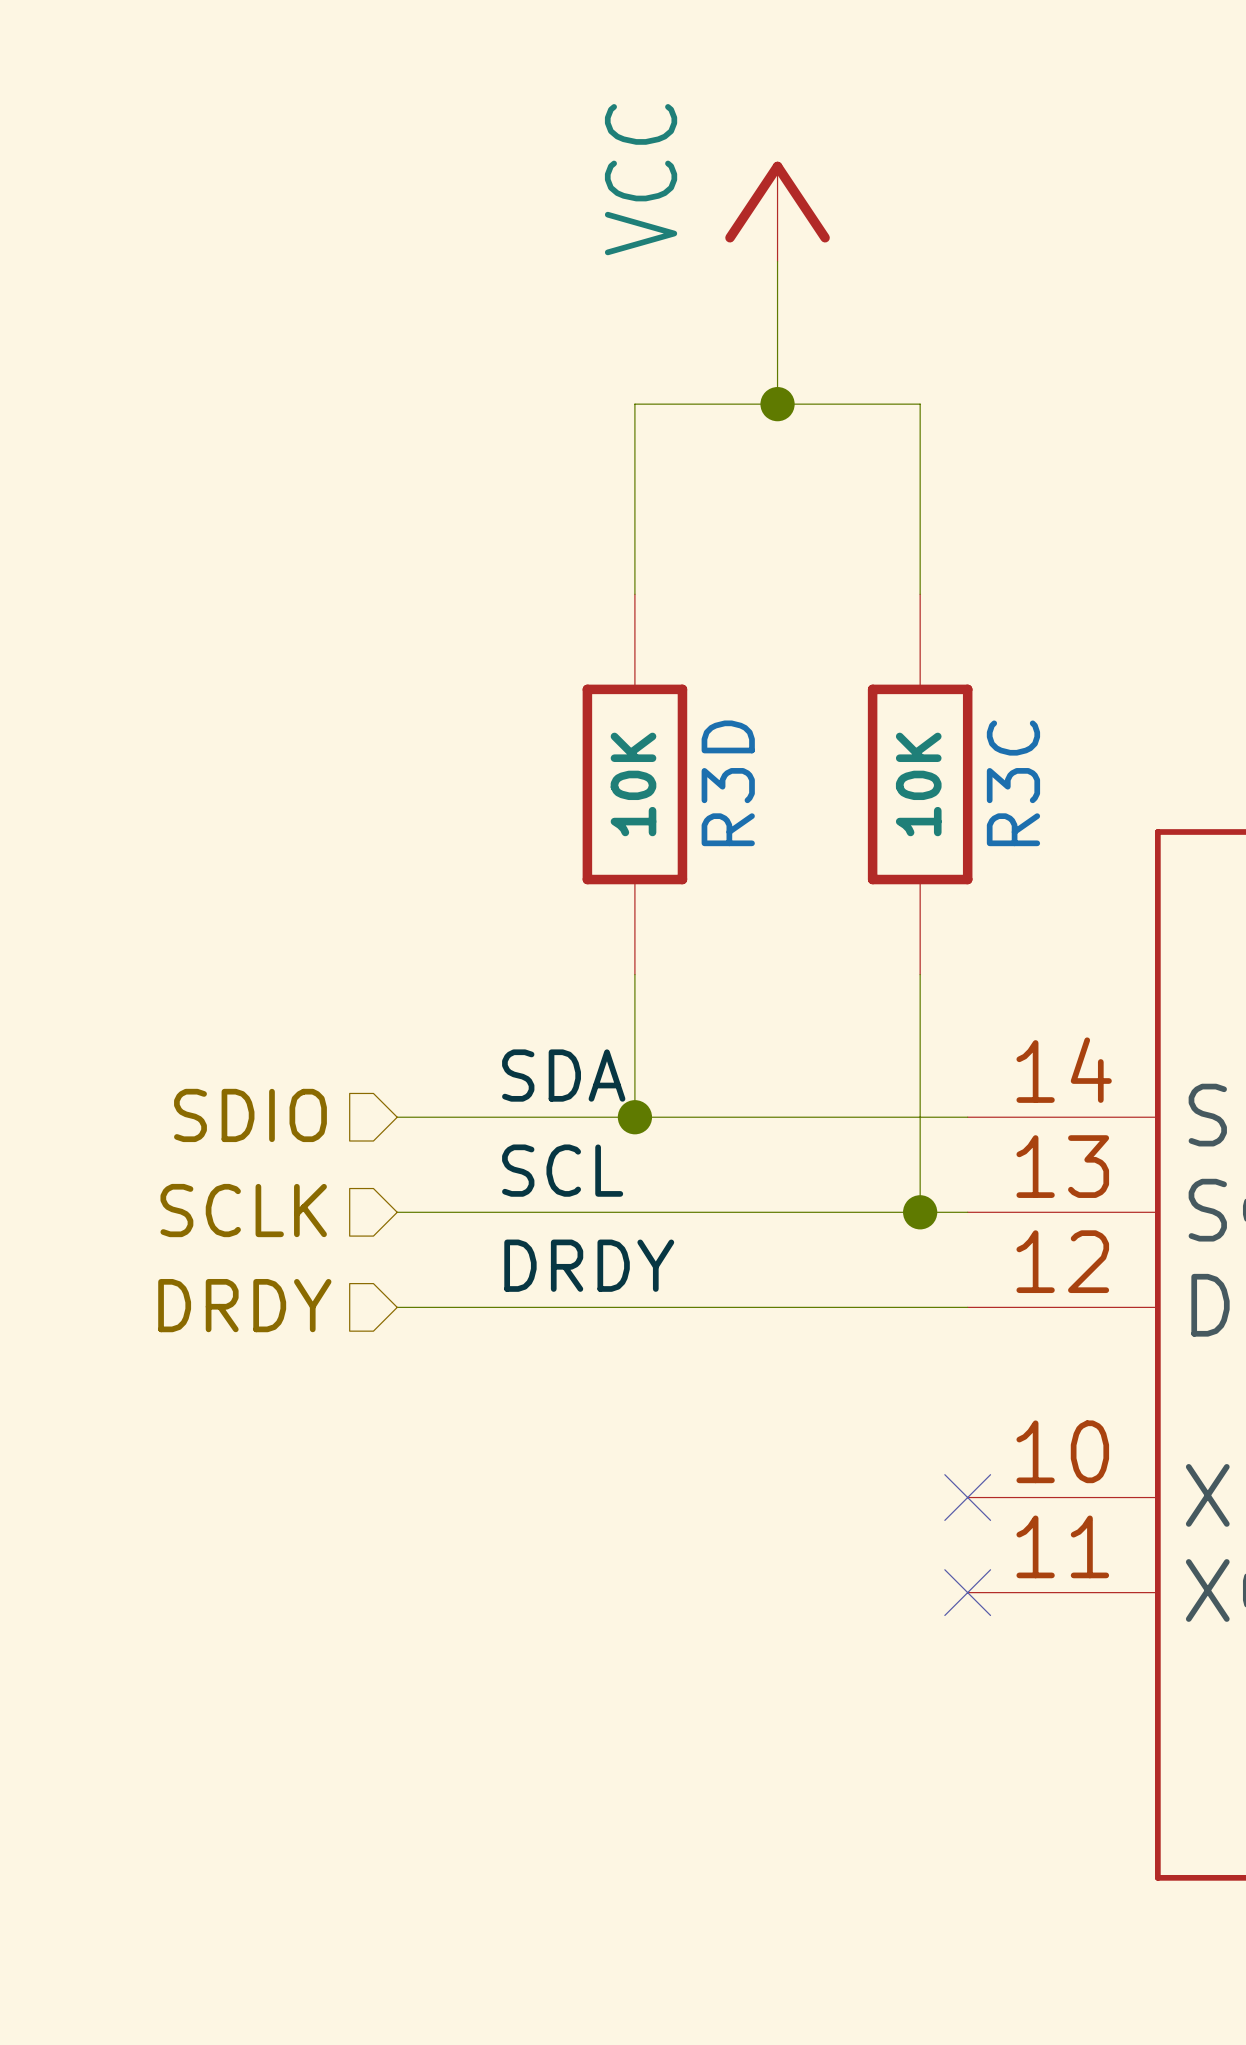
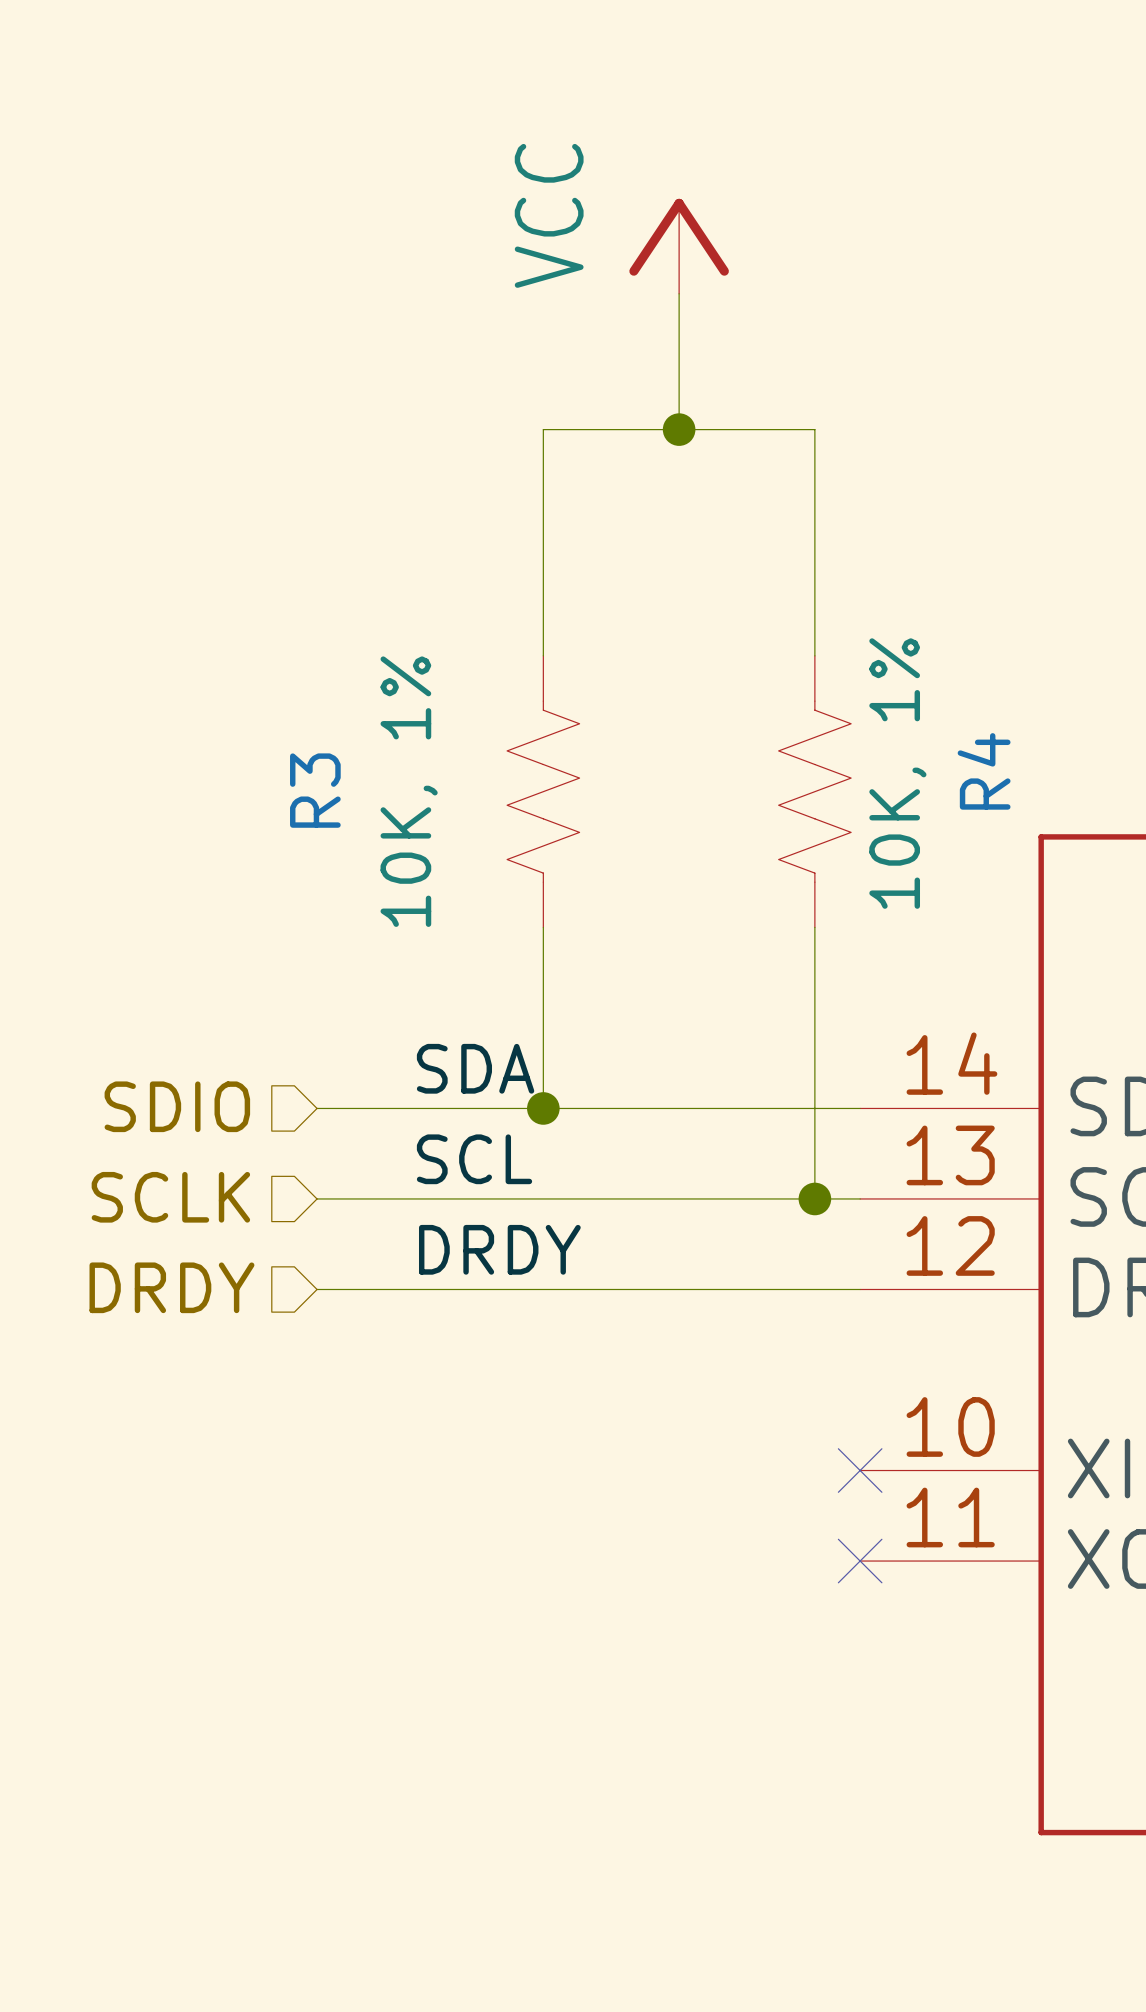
R3D: 10K (634, 784) -> none
R3: none -> 10K, 1% (543, 791)
R3C: 10K (920, 784) -> none
R4: none -> 10K, 1% (814, 791)

